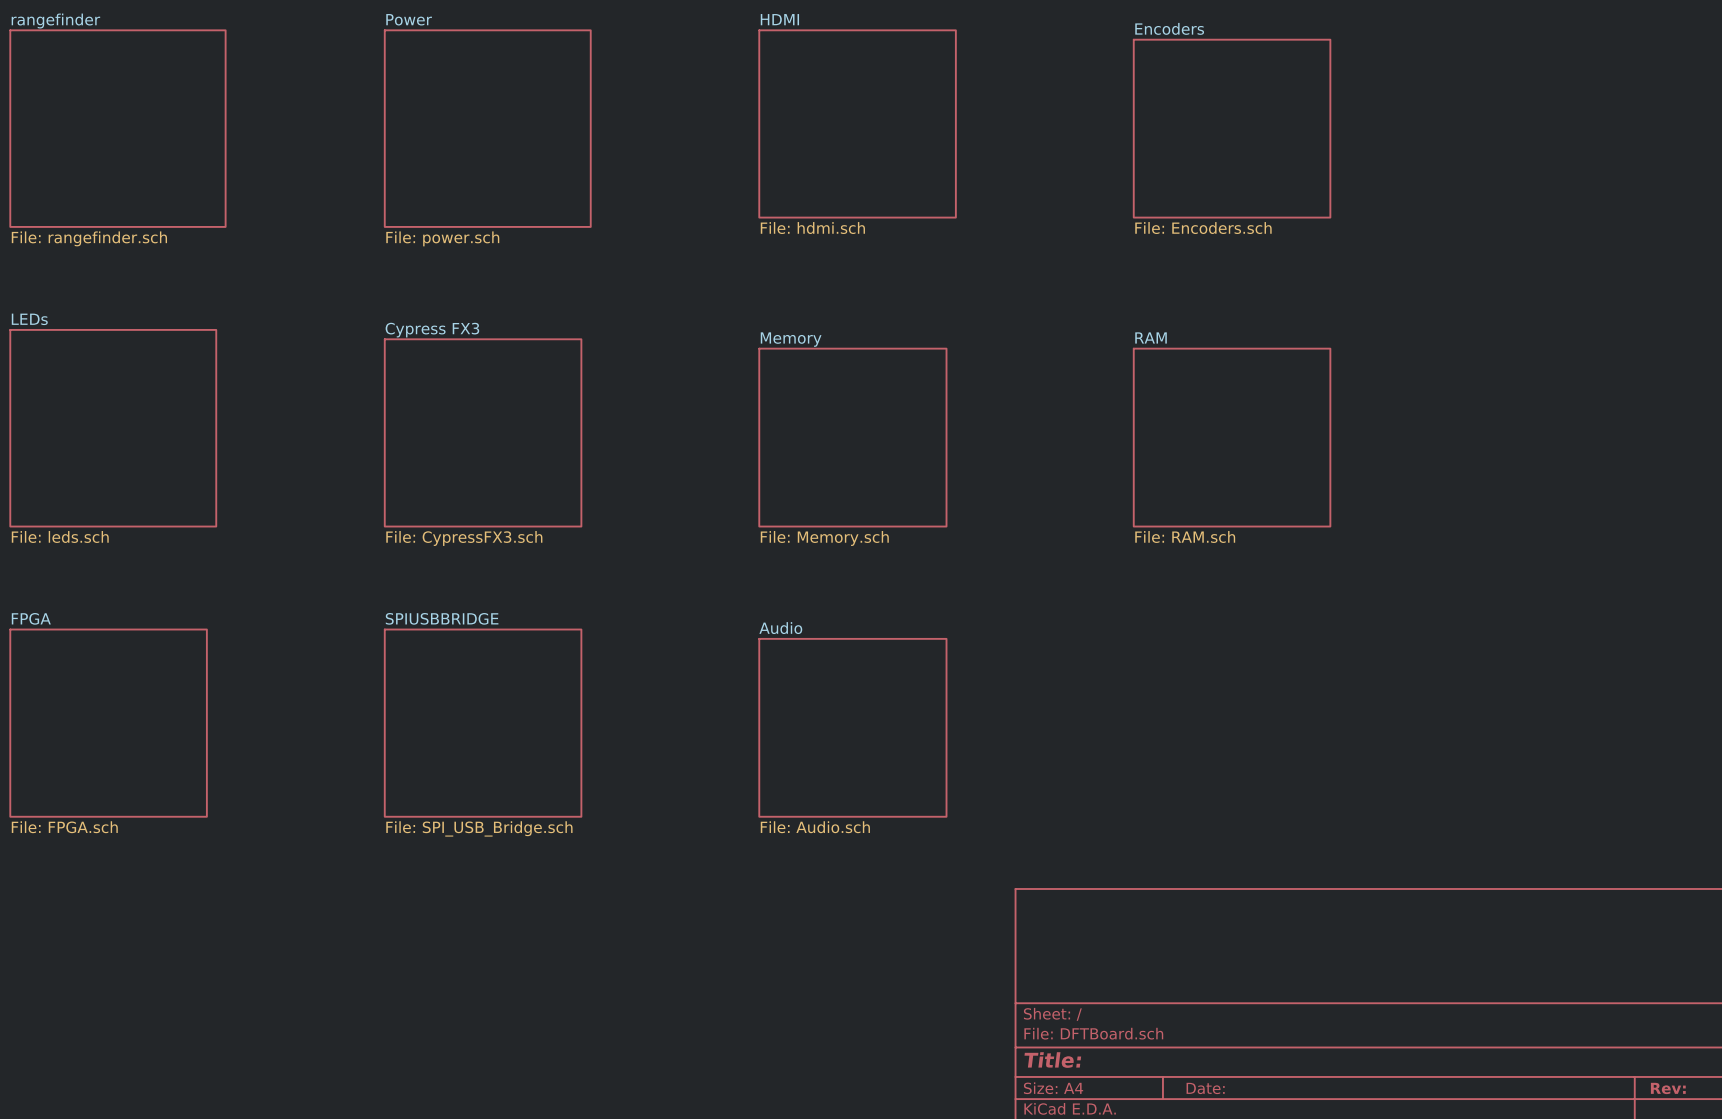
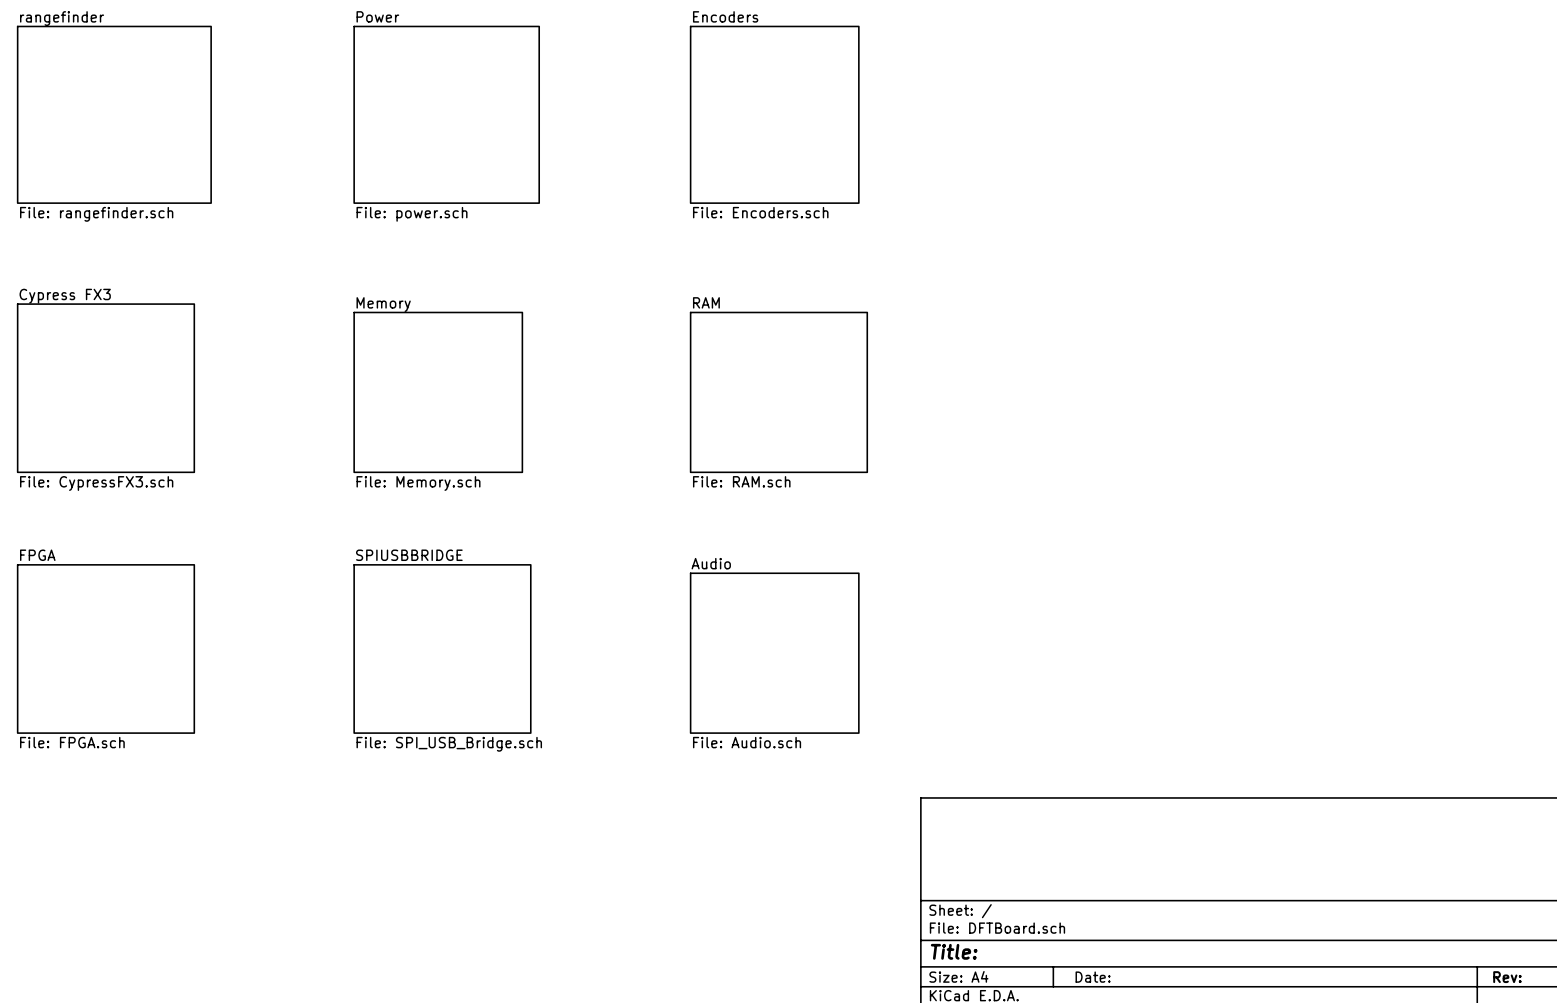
sheet HDMI: File: hdmi.sch (857, 123) -> none
sheet Encoders: none -> File: Encoders.sch (774, 114)
sheet Encoders: File: Encoders.sch (1232, 128) -> none
sheet LEDs: File: leds.sch (113, 428) -> none
sheet Cypress FX3 position: (483, 432) -> (105, 388)
sheet Memory: none -> File: Memory.sch (438, 392)
sheet Memory: File: Memory.sch (852, 437) -> none
sheet RAM: none -> File: RAM.sch (778, 392)
sheet RAM: File: RAM.sch (1232, 437) -> none

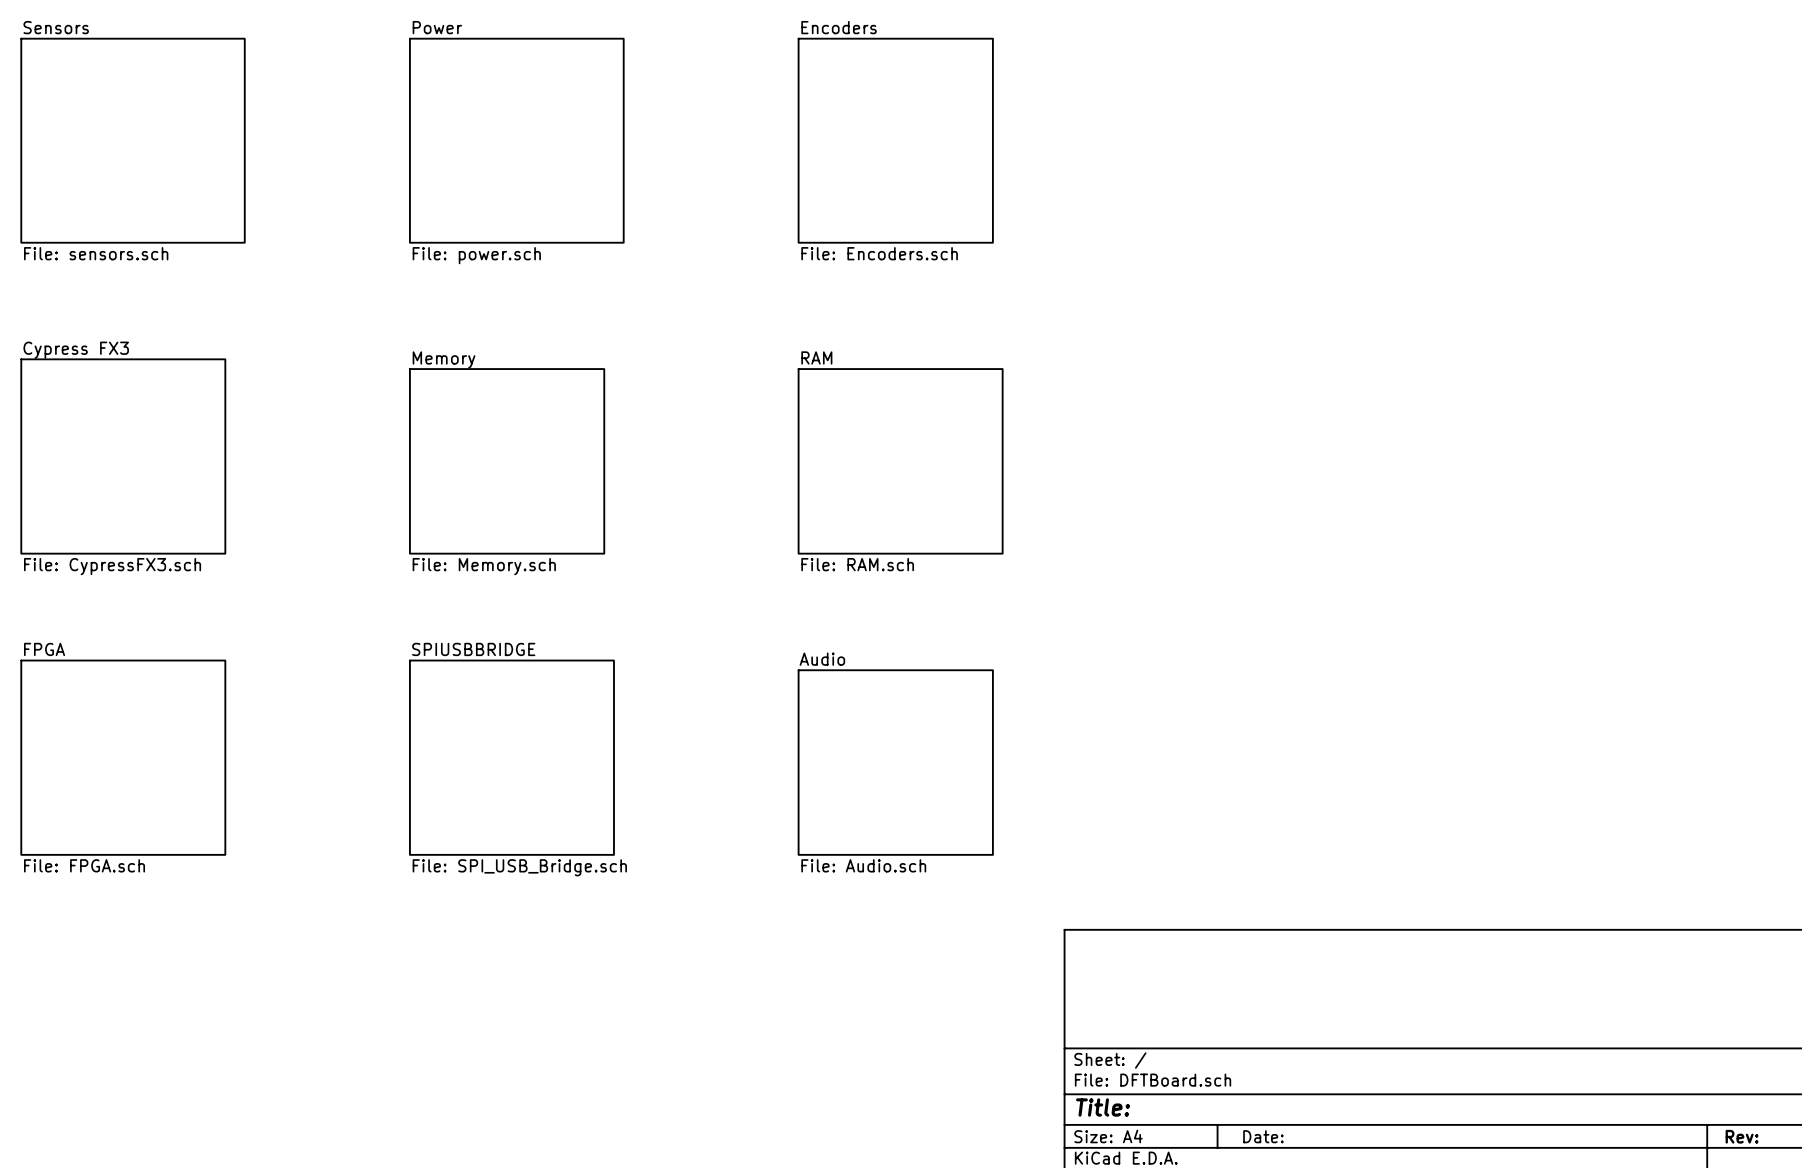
sheet rangefinder name: rangefinder (62, 18) -> Sensors (56, 27)
sheet rangefinder value: File: rangefinder.sch (96, 214) -> File: sensors.sch (96, 253)

